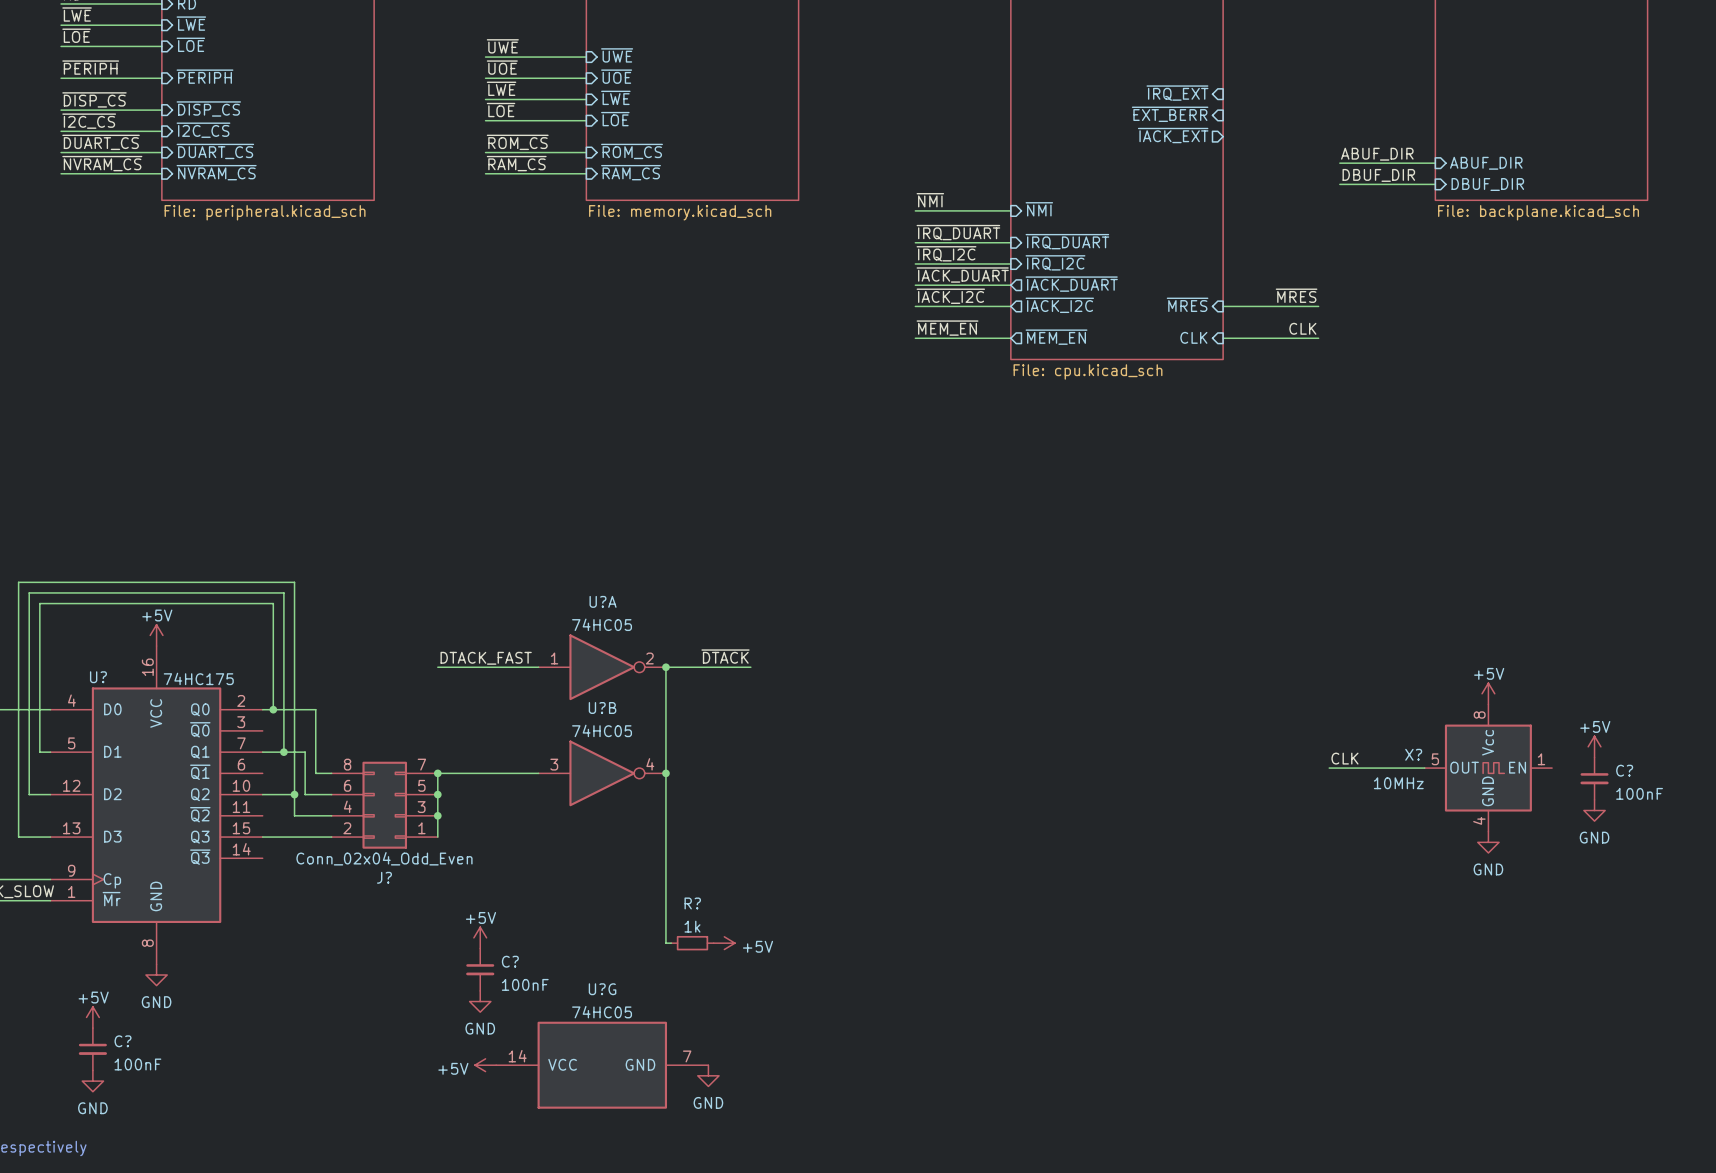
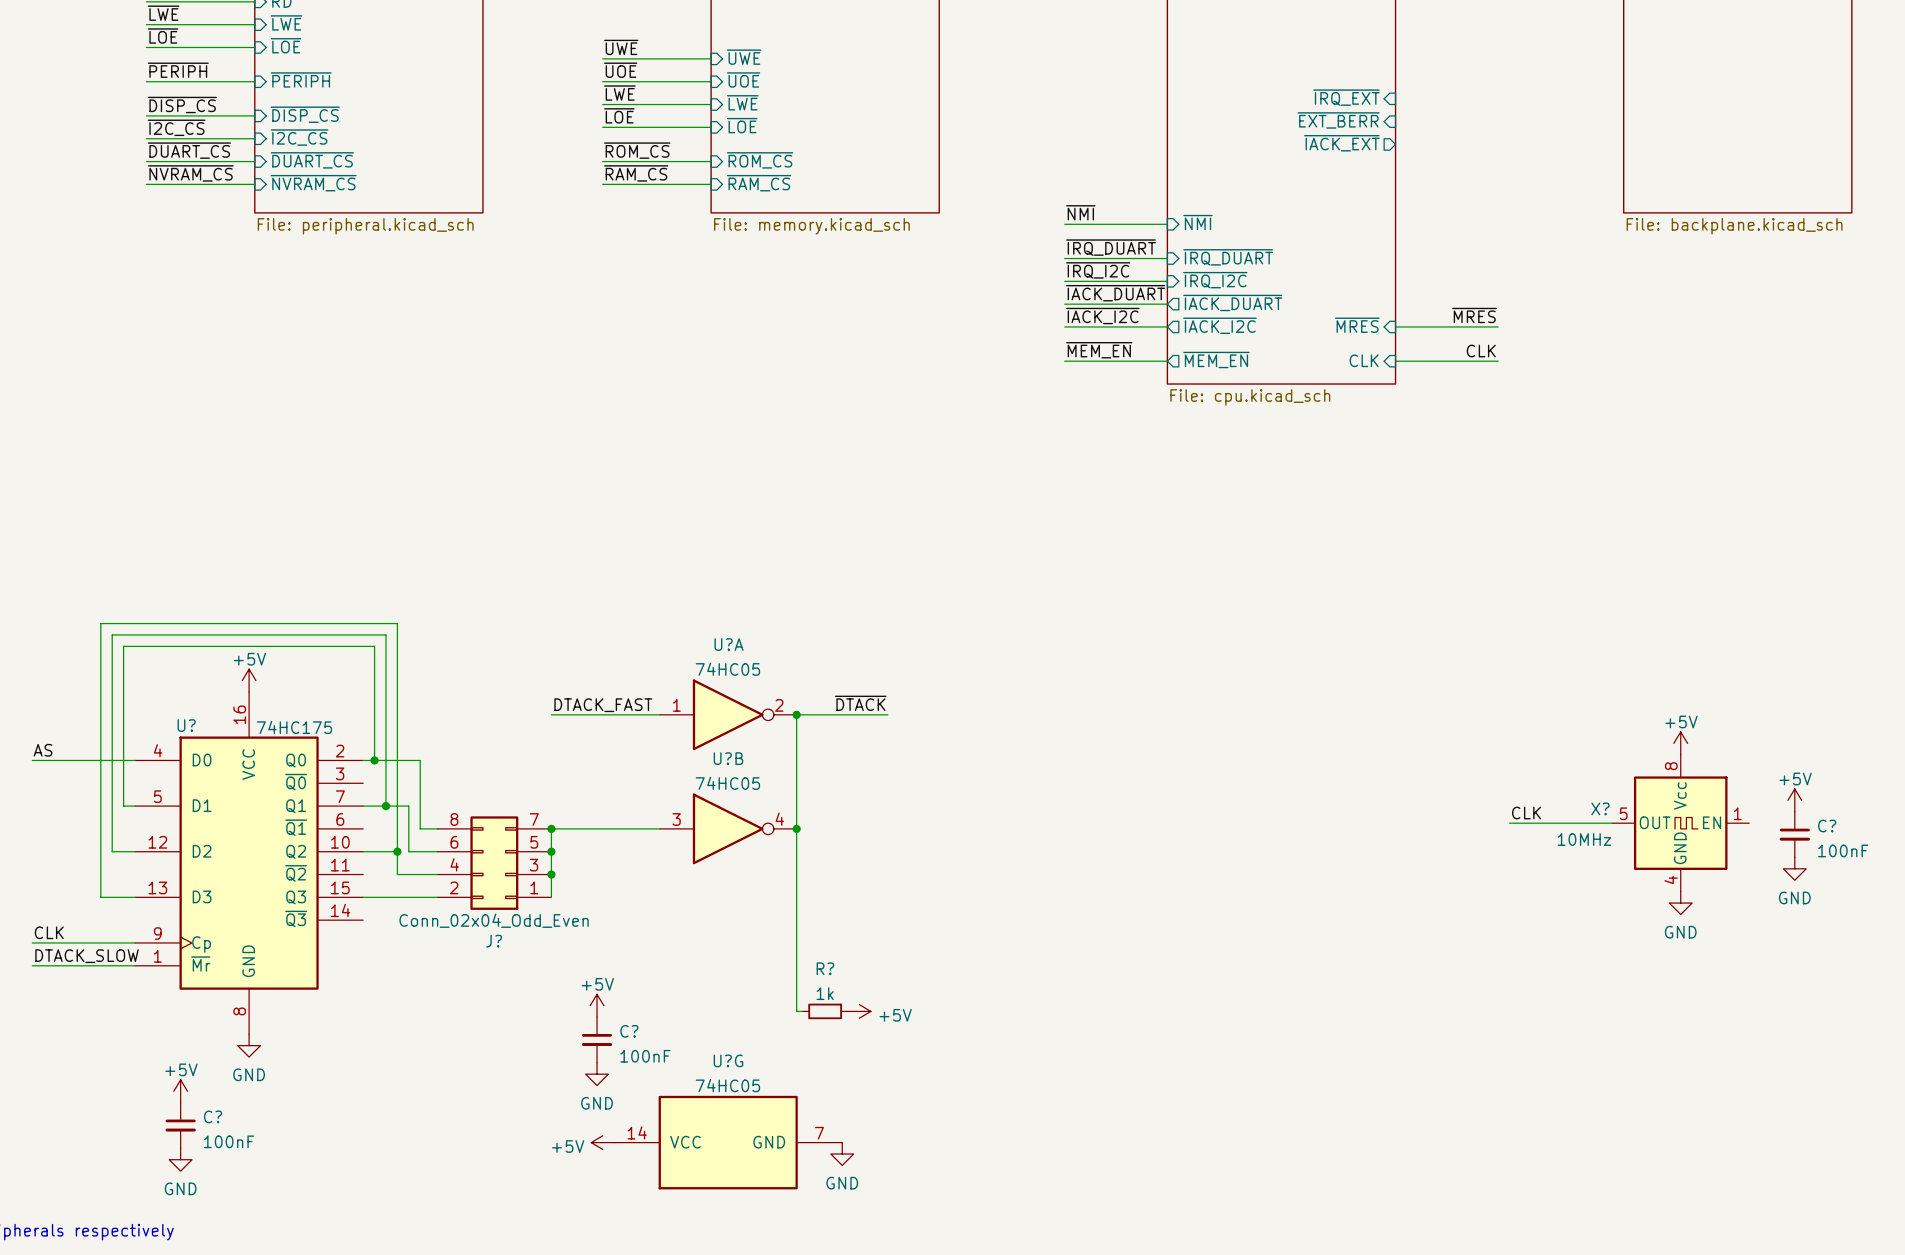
label: ABUF_DIR (1377, 154) -> none
wire: (1339, 163) (1435, 163) -> none
sheet pin: ABUF_DIR (1486, 163) -> none
label: DBUF_DIR (1378, 175) -> none
wire: (1339, 184) (1435, 184) -> none
sheet pin: DBUF_DIR (1487, 184) -> none

